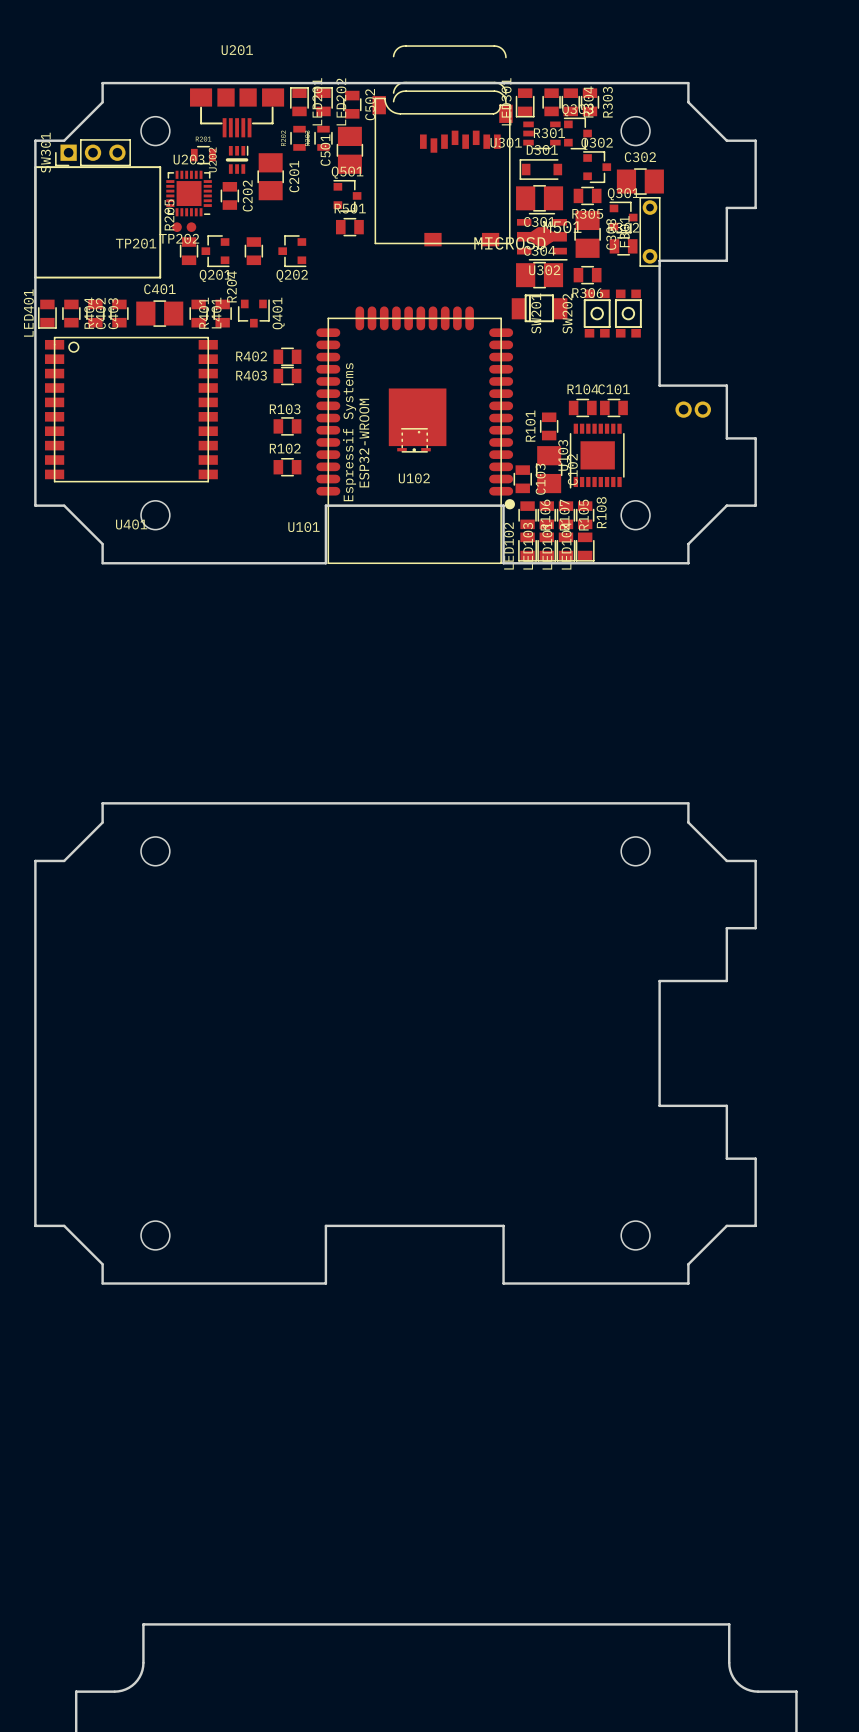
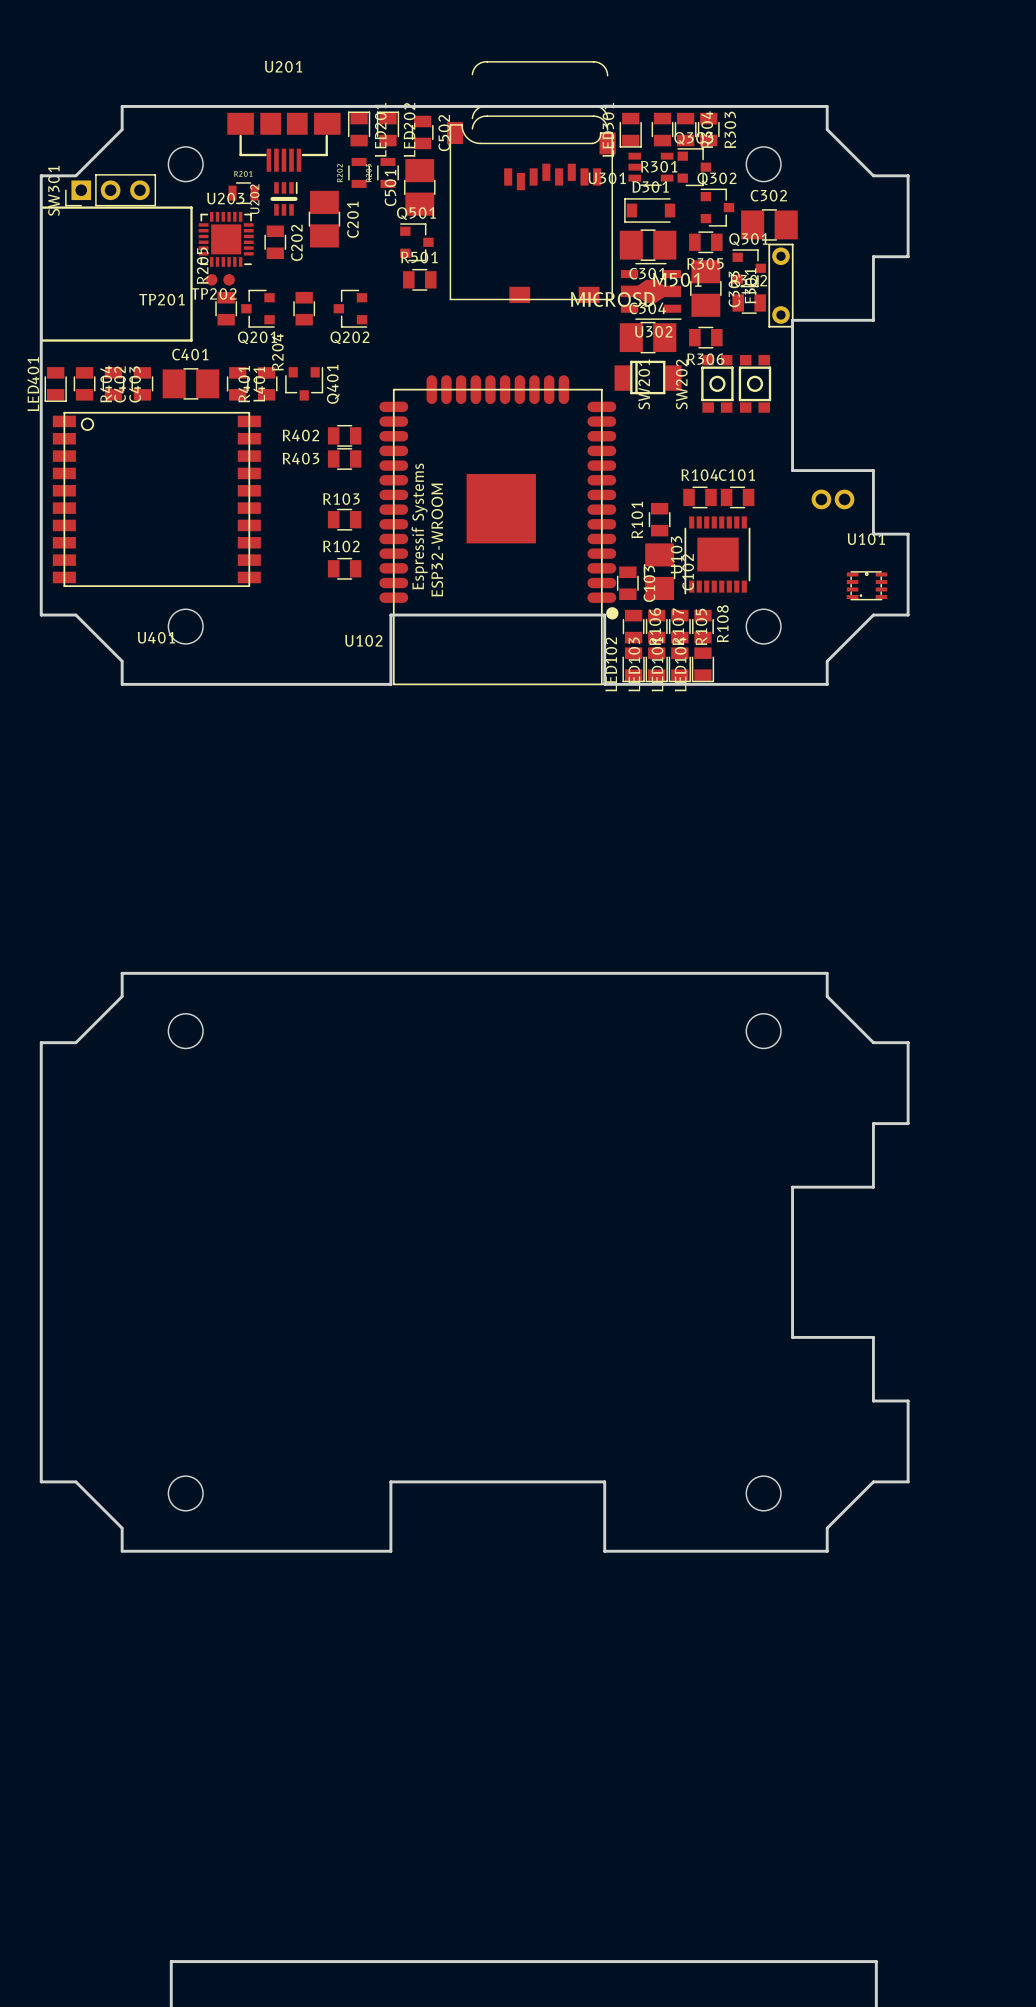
U102: (414, 440) -> none
U101: none -> (867, 585)
U101 name: U101 (303, 527) -> U102 (363, 640)

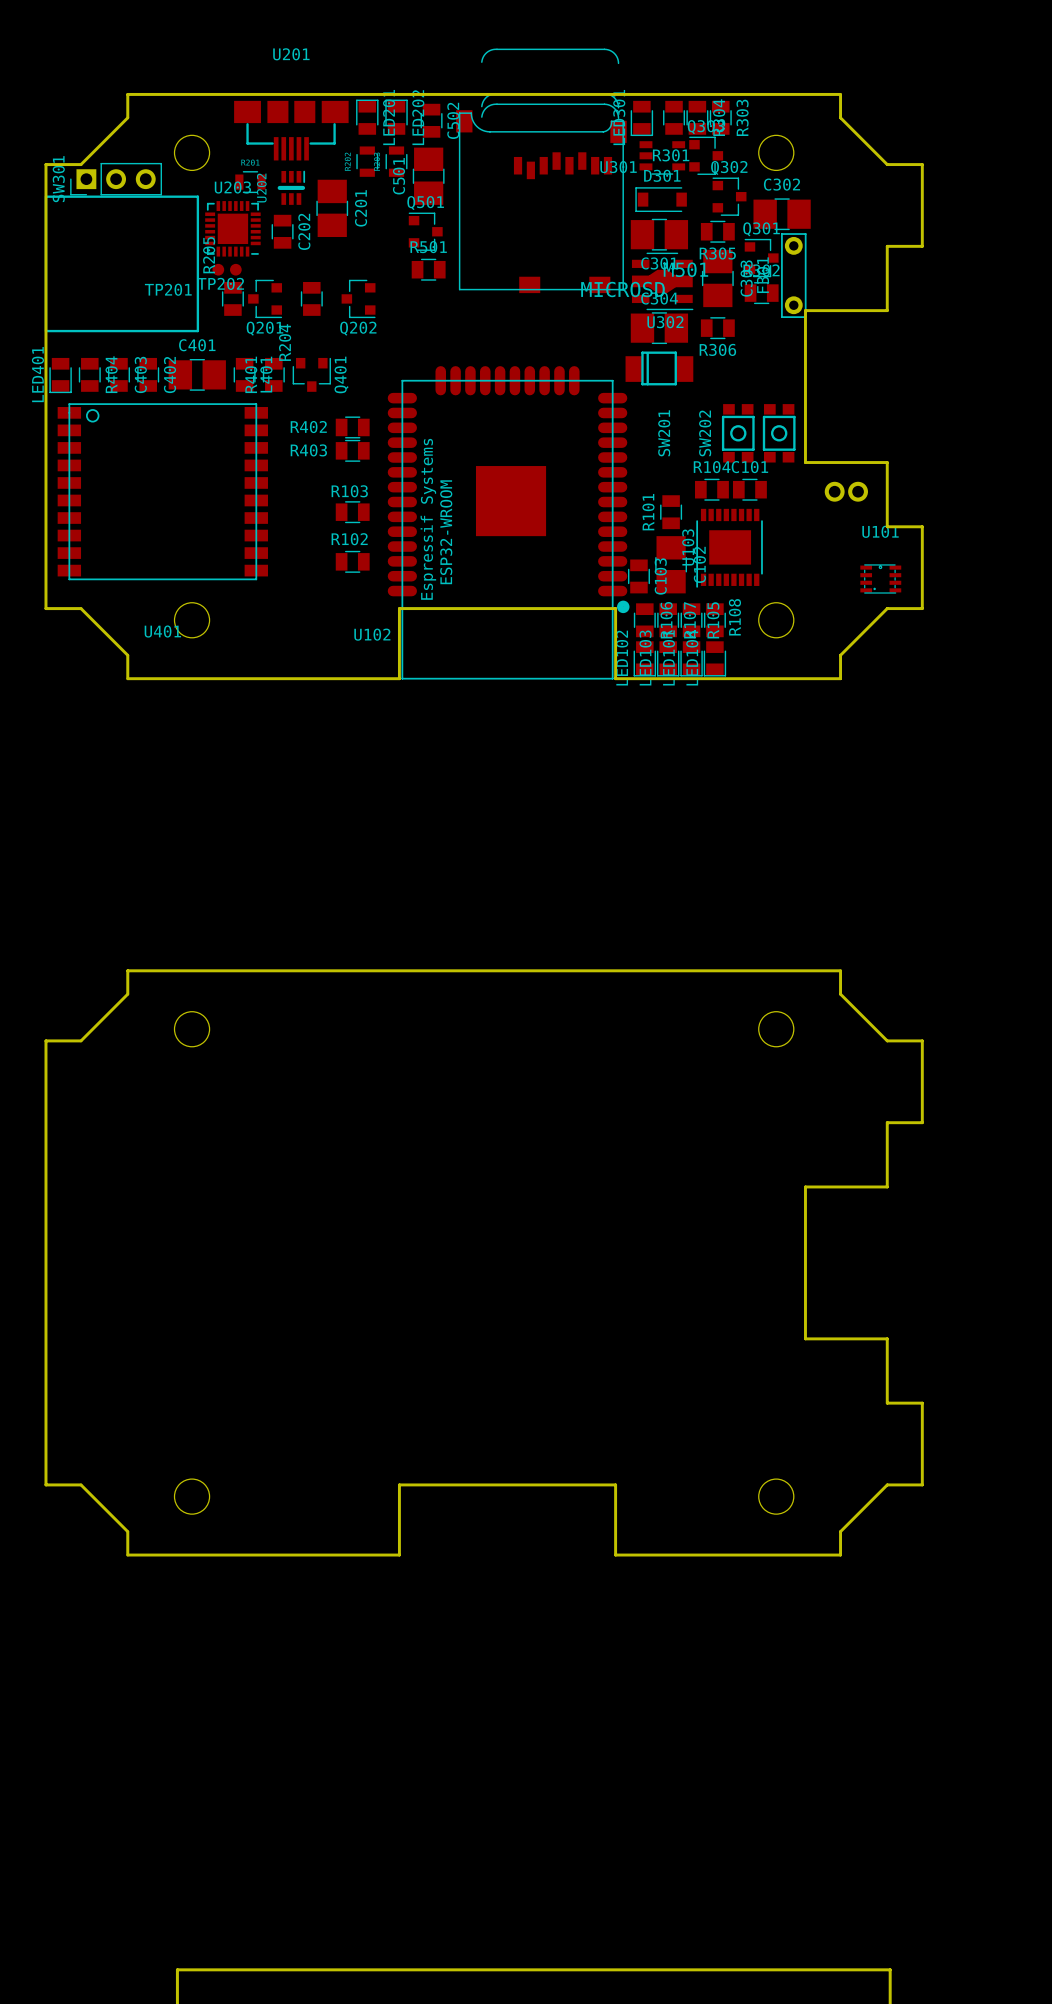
SW201 position: (717, 383) -> (738, 433)
SW202 position: (754, 383) -> (779, 433)
C402 name position: C402 (120, 384) -> C402 (169, 375)

